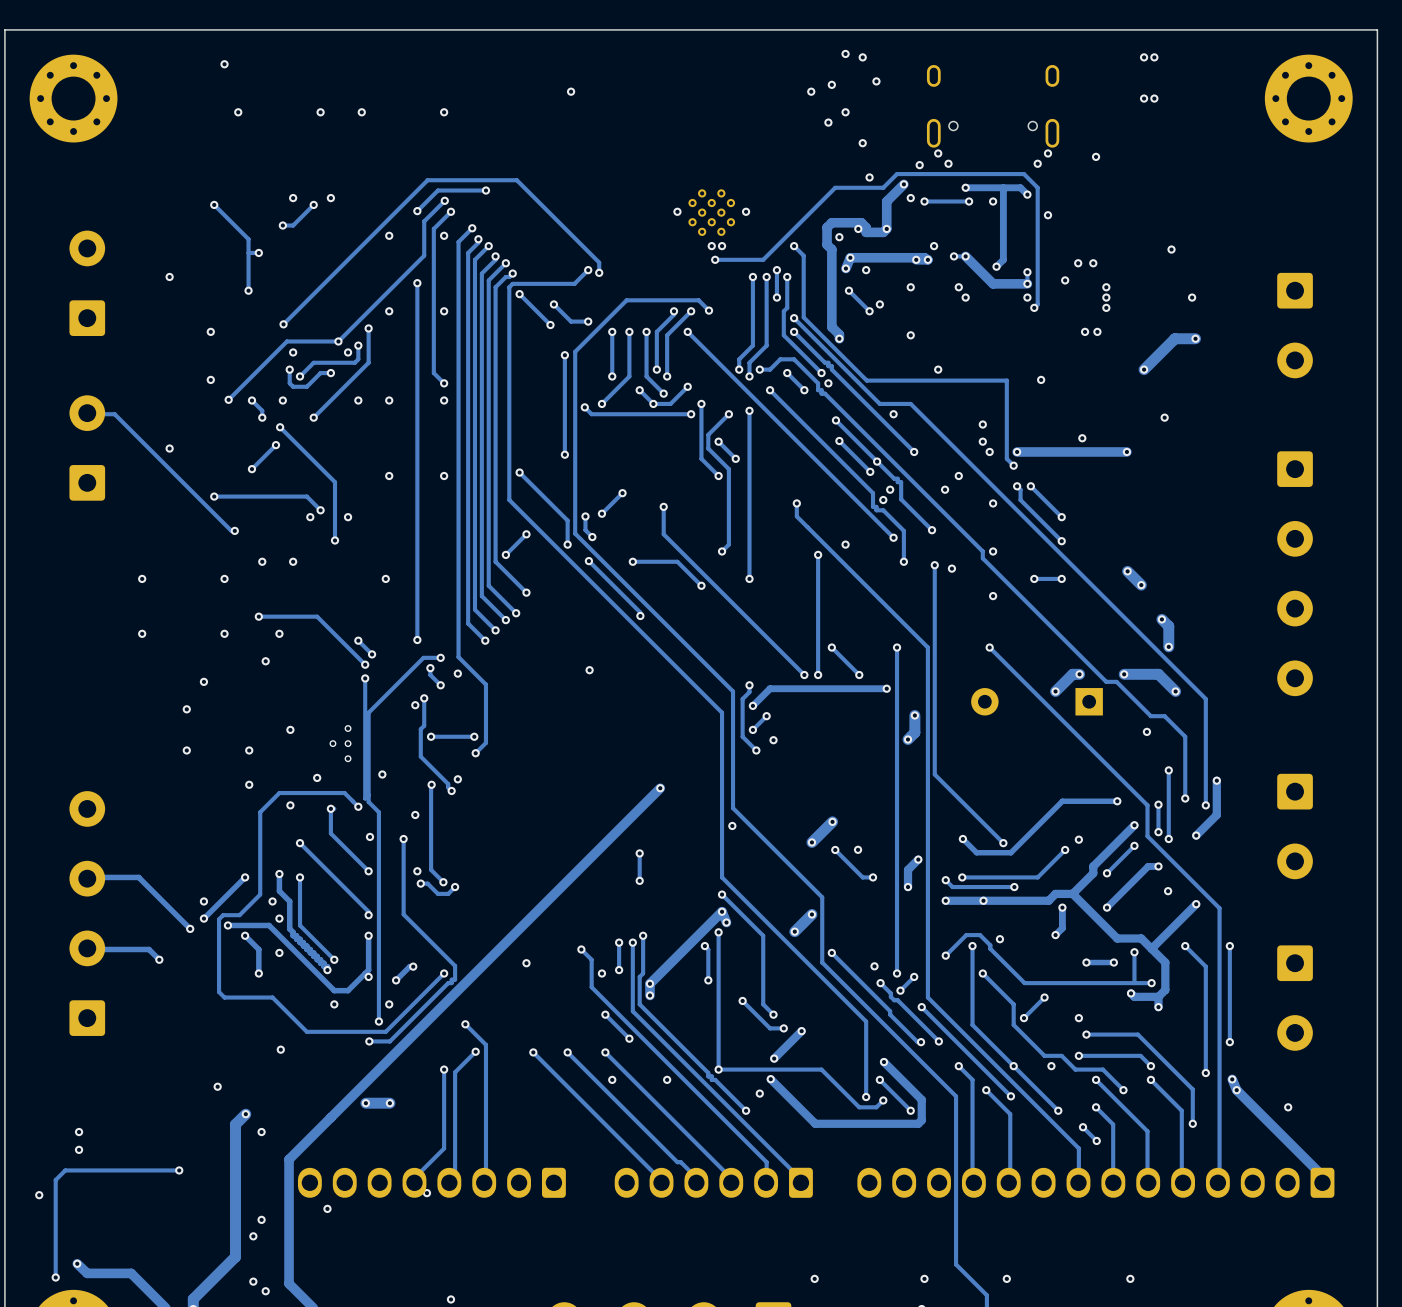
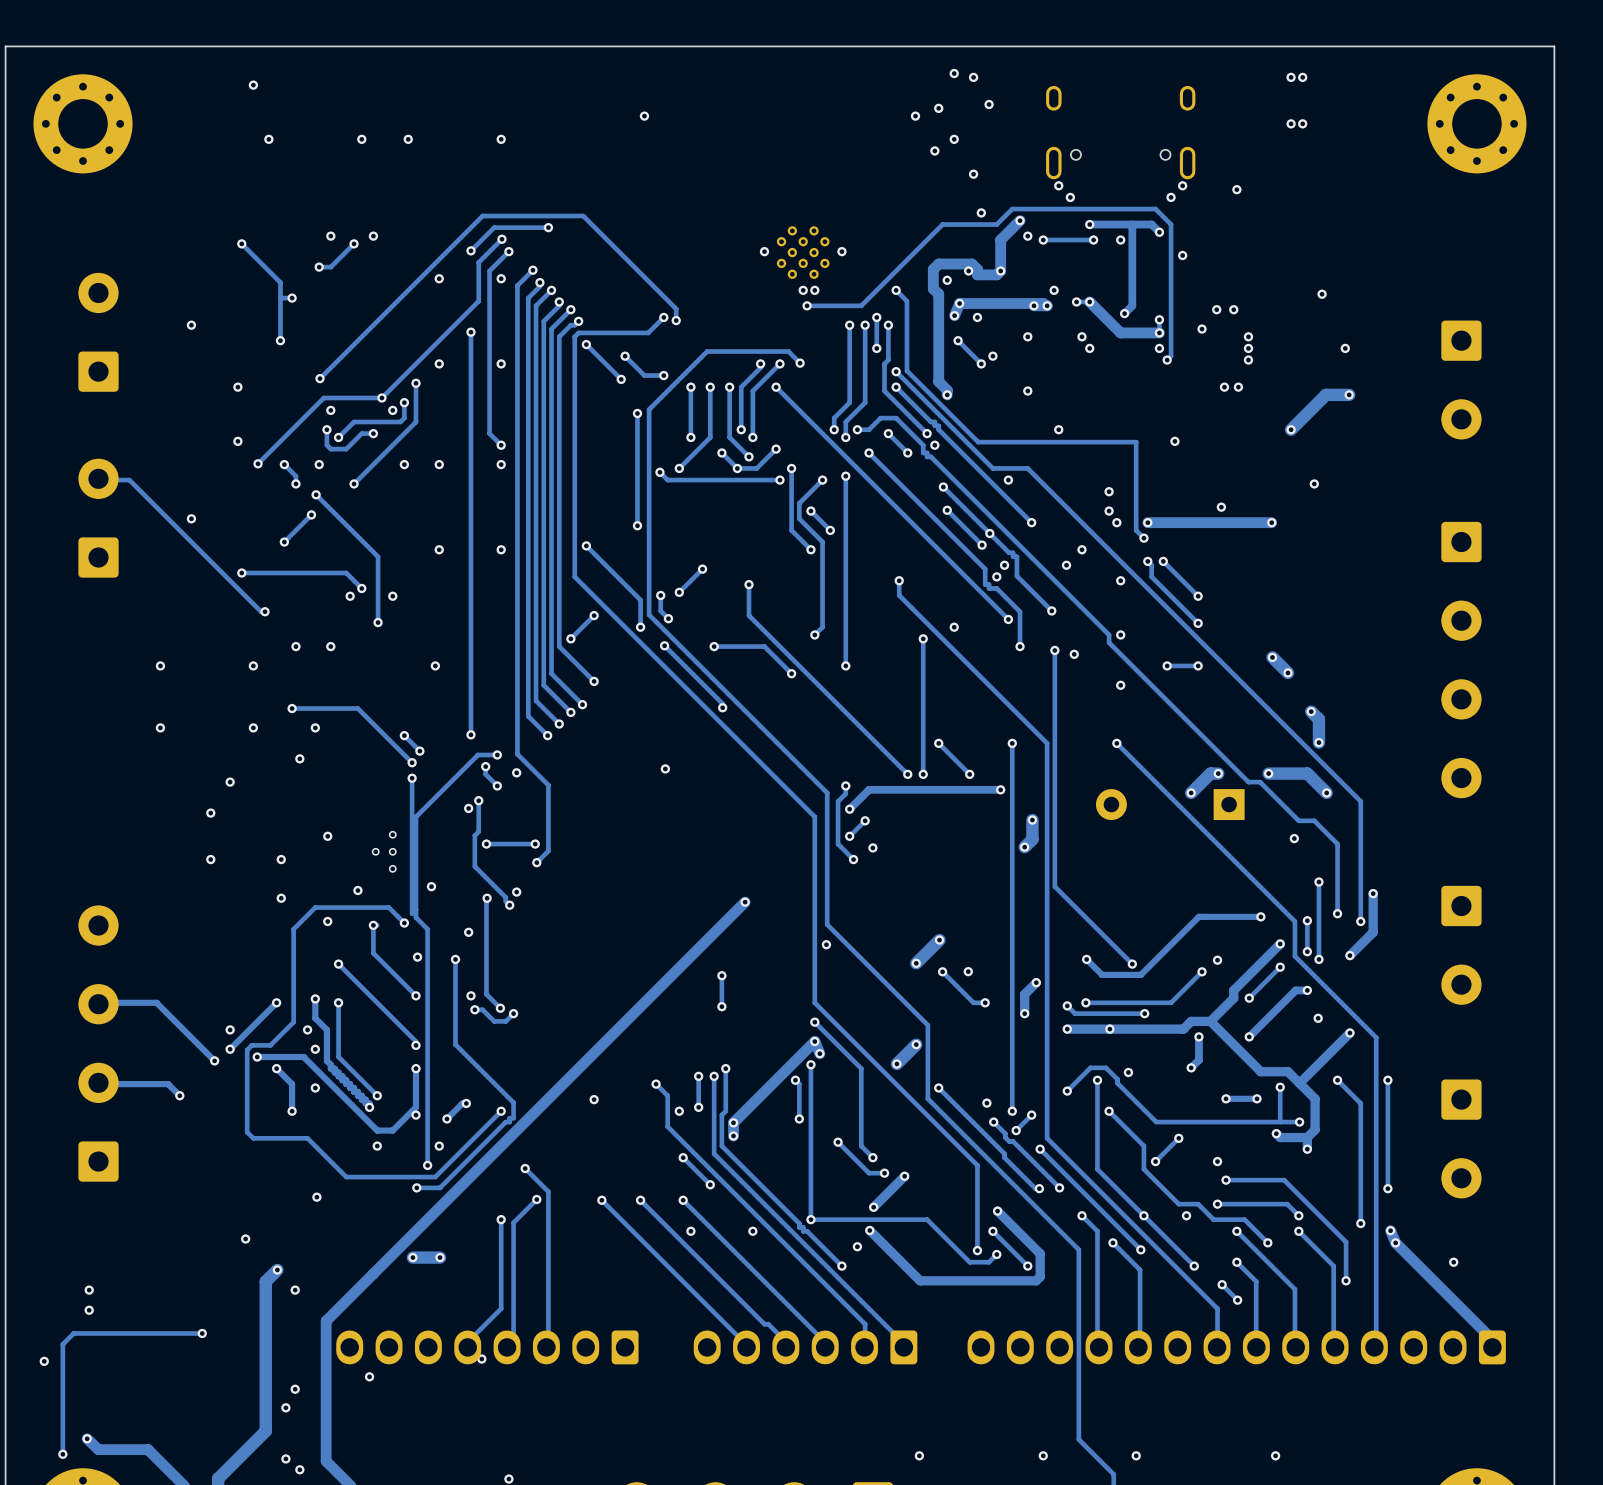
via: (919, 165) -> none

